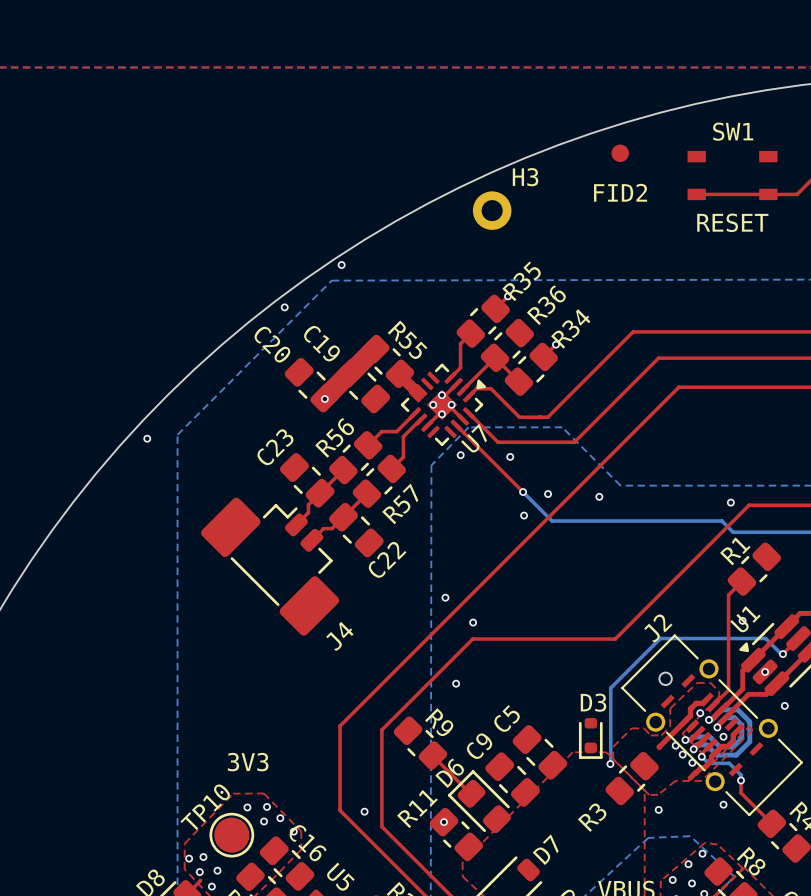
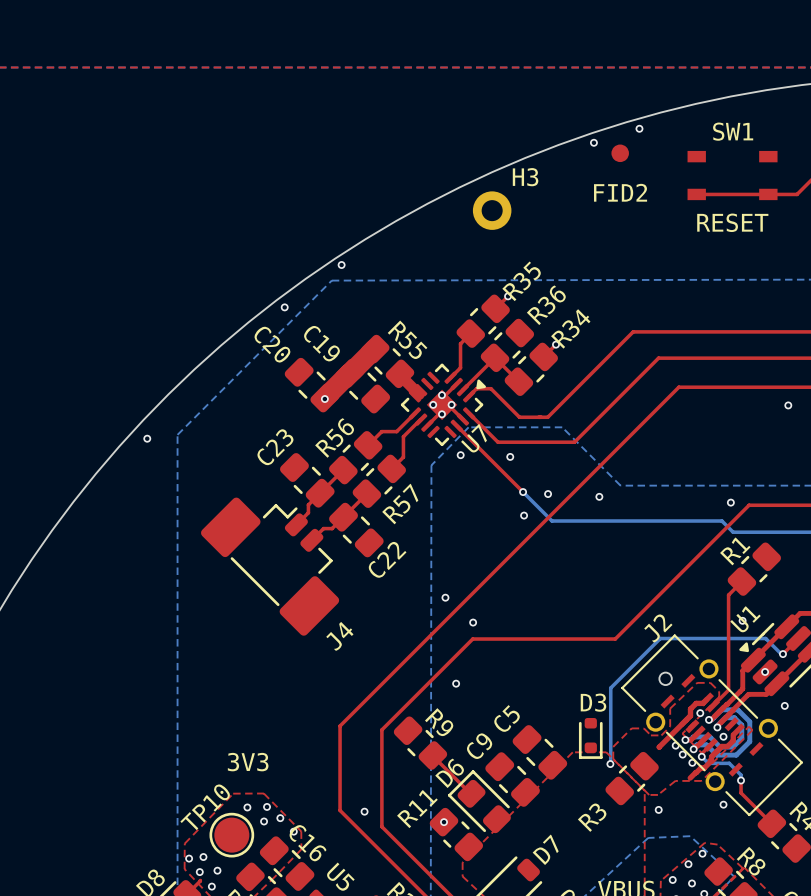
via: none -> (639, 128)
via: none -> (593, 142)
via: none -> (788, 405)

